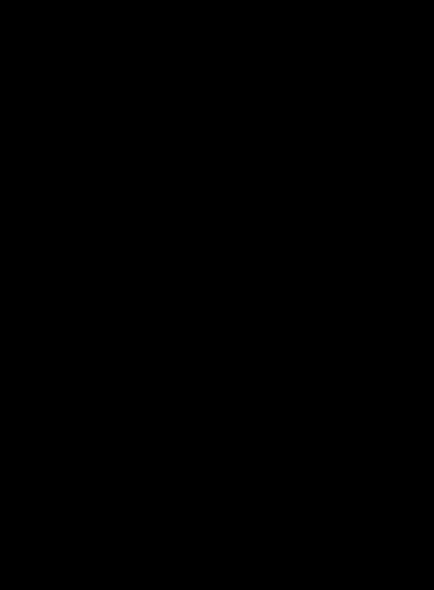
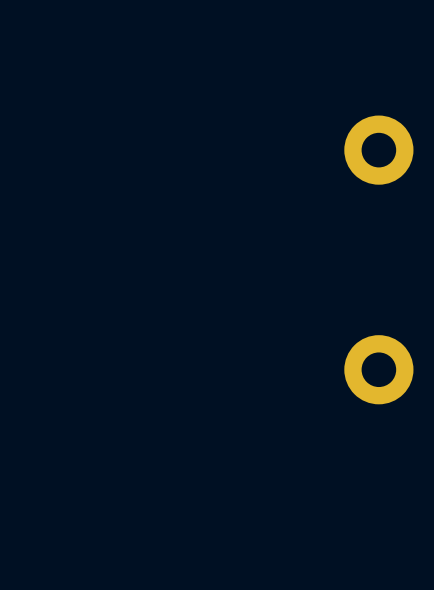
part: none -> (378, 150)
part: none -> (378, 369)

